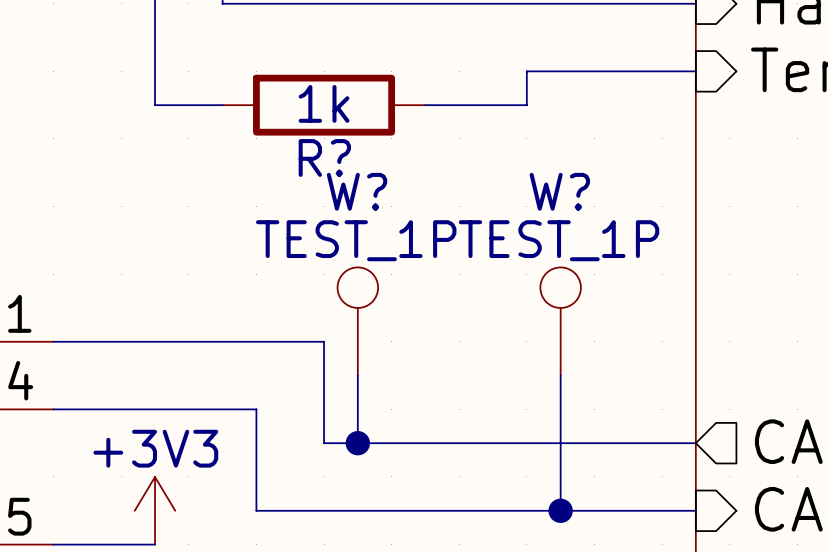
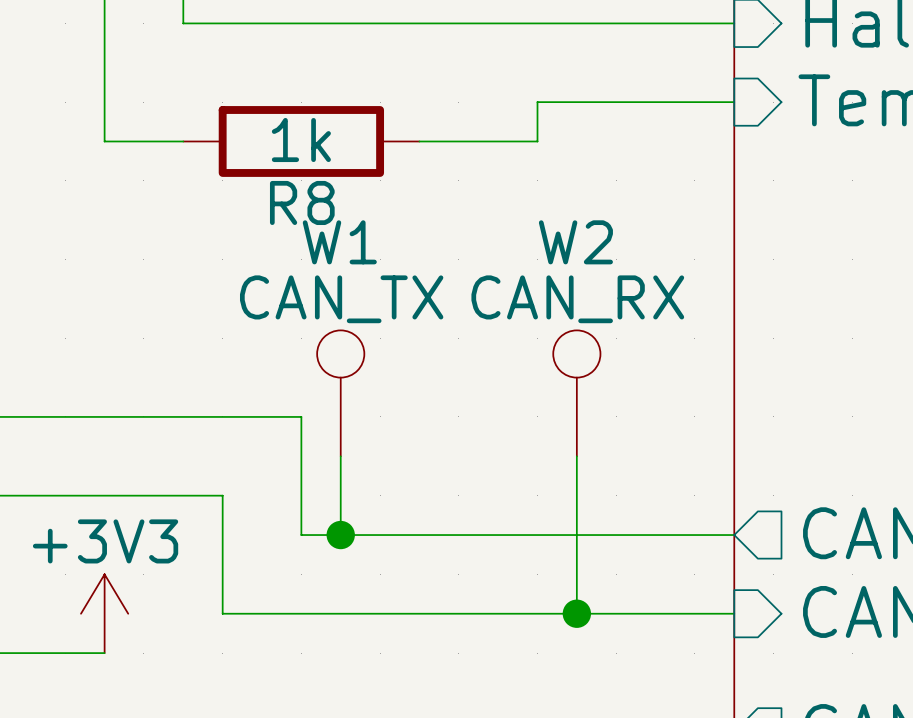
R? name: R? (324, 157) -> R8 (302, 202)
W? name: W? (357, 191) -> W1 (339, 242)
W? name: W? (559, 191) -> W2 (575, 242)
W? value: TEST_1P (356, 240) -> CAN_TX (341, 299)
W? value: TEST_1P (559, 240) -> CAN_RX (577, 299)

